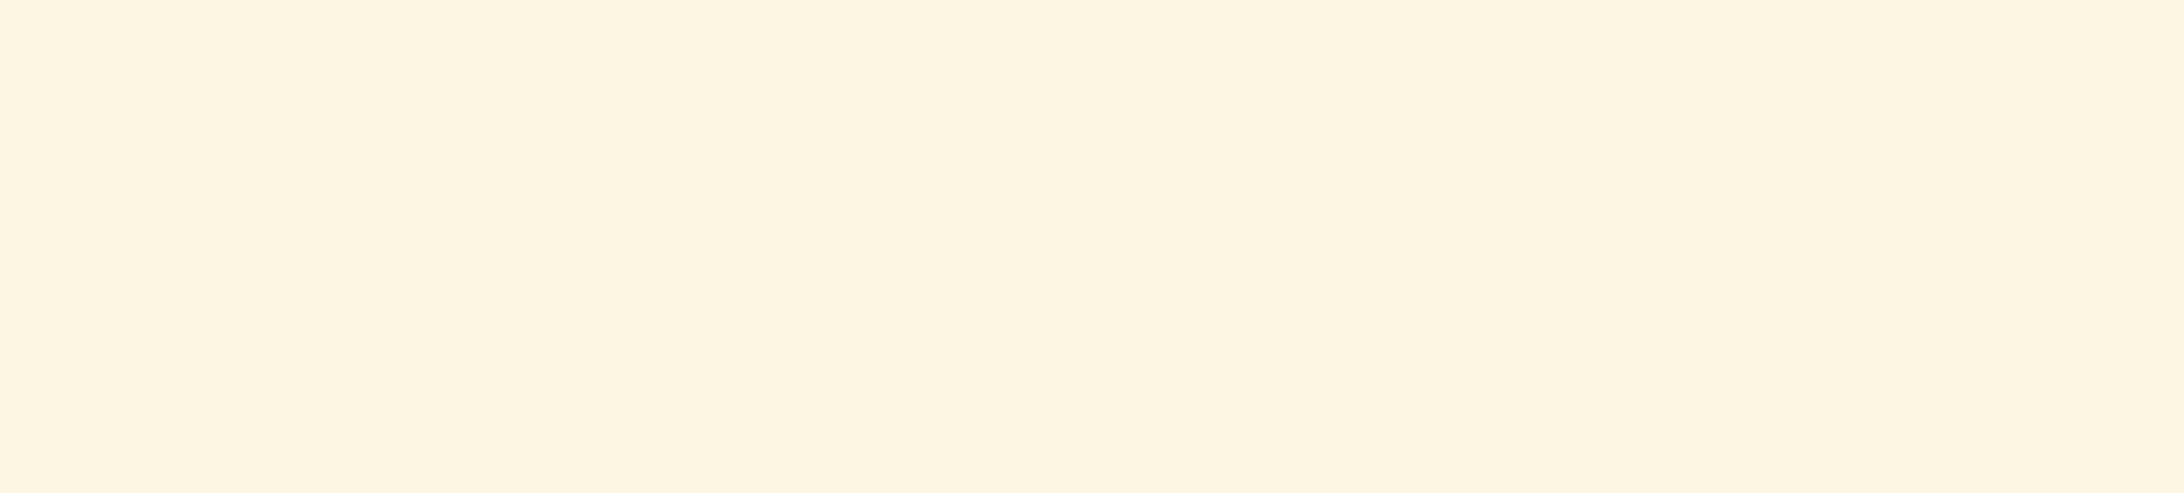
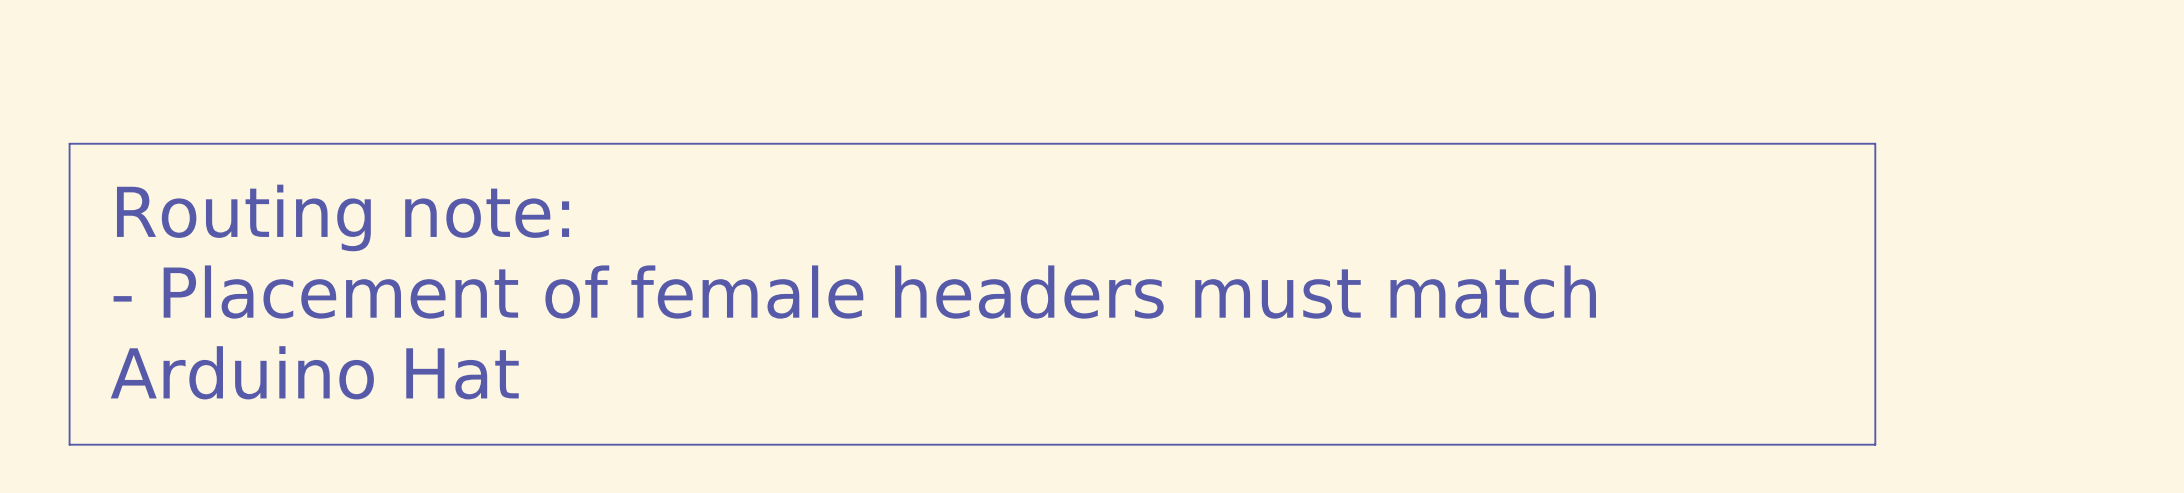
line: none -> (69, 143) (1875, 143) (1875, 444) (69, 444) (69, 143)
text: none -> Routing note: (343, 217)
text: none -> - Placement of female headers must match (854, 292)
text: none -> Arduino Hat (314, 372)

